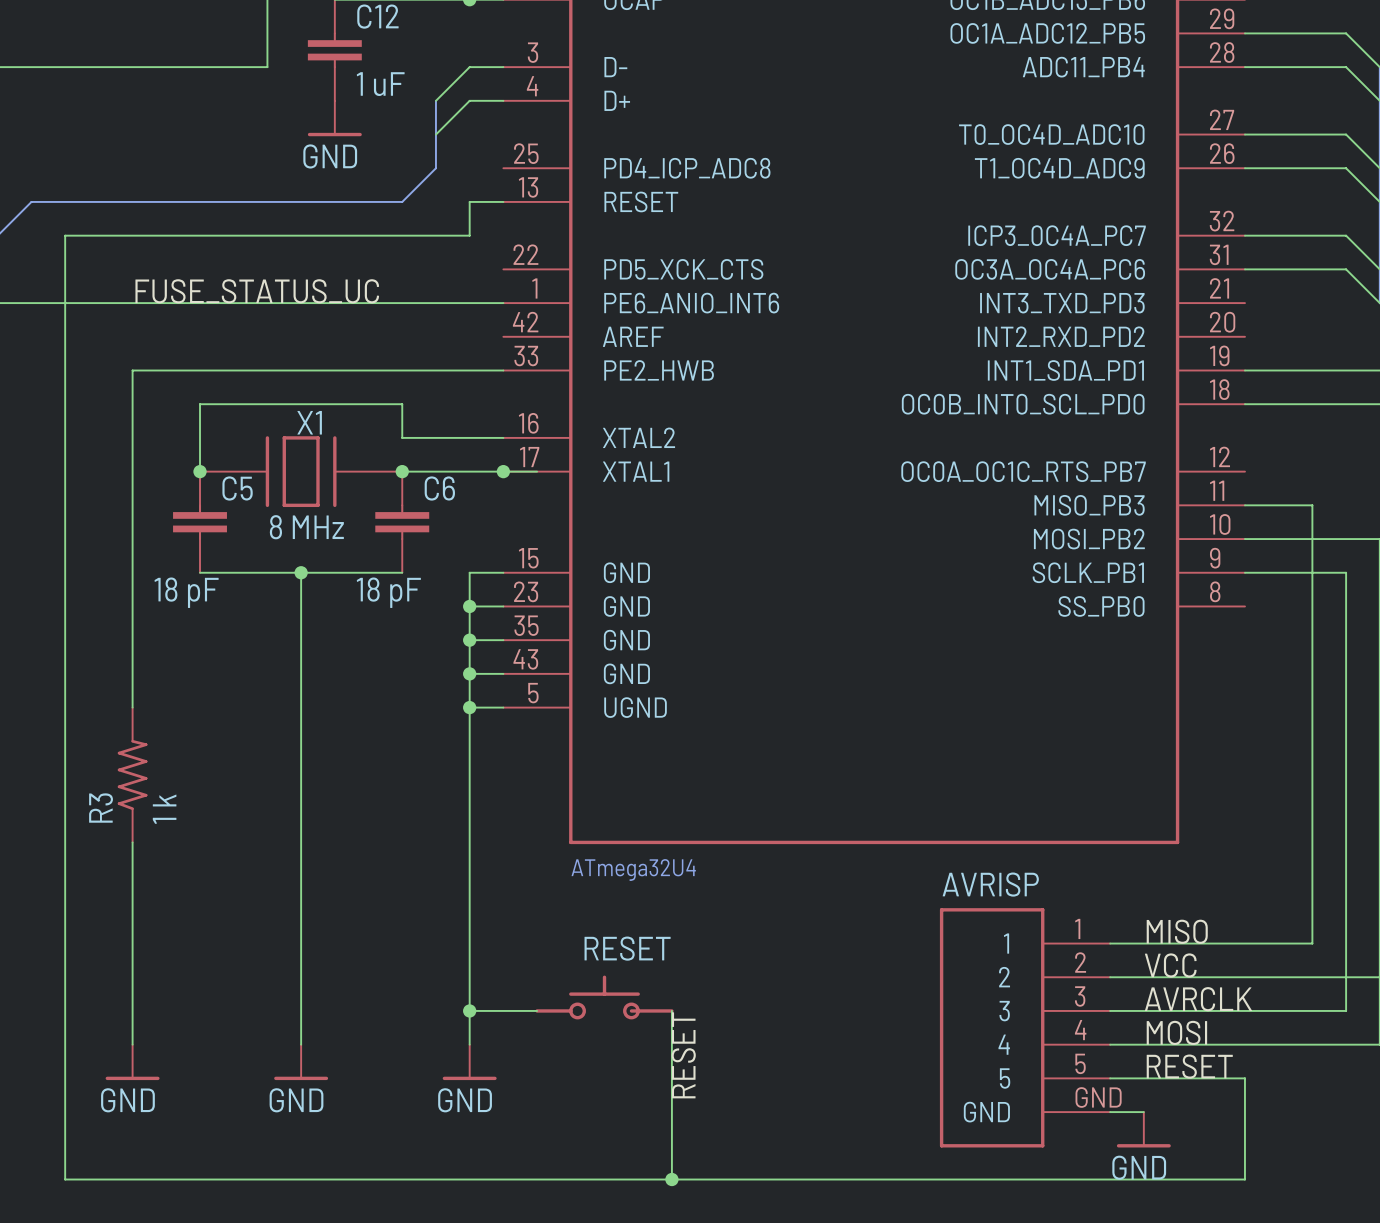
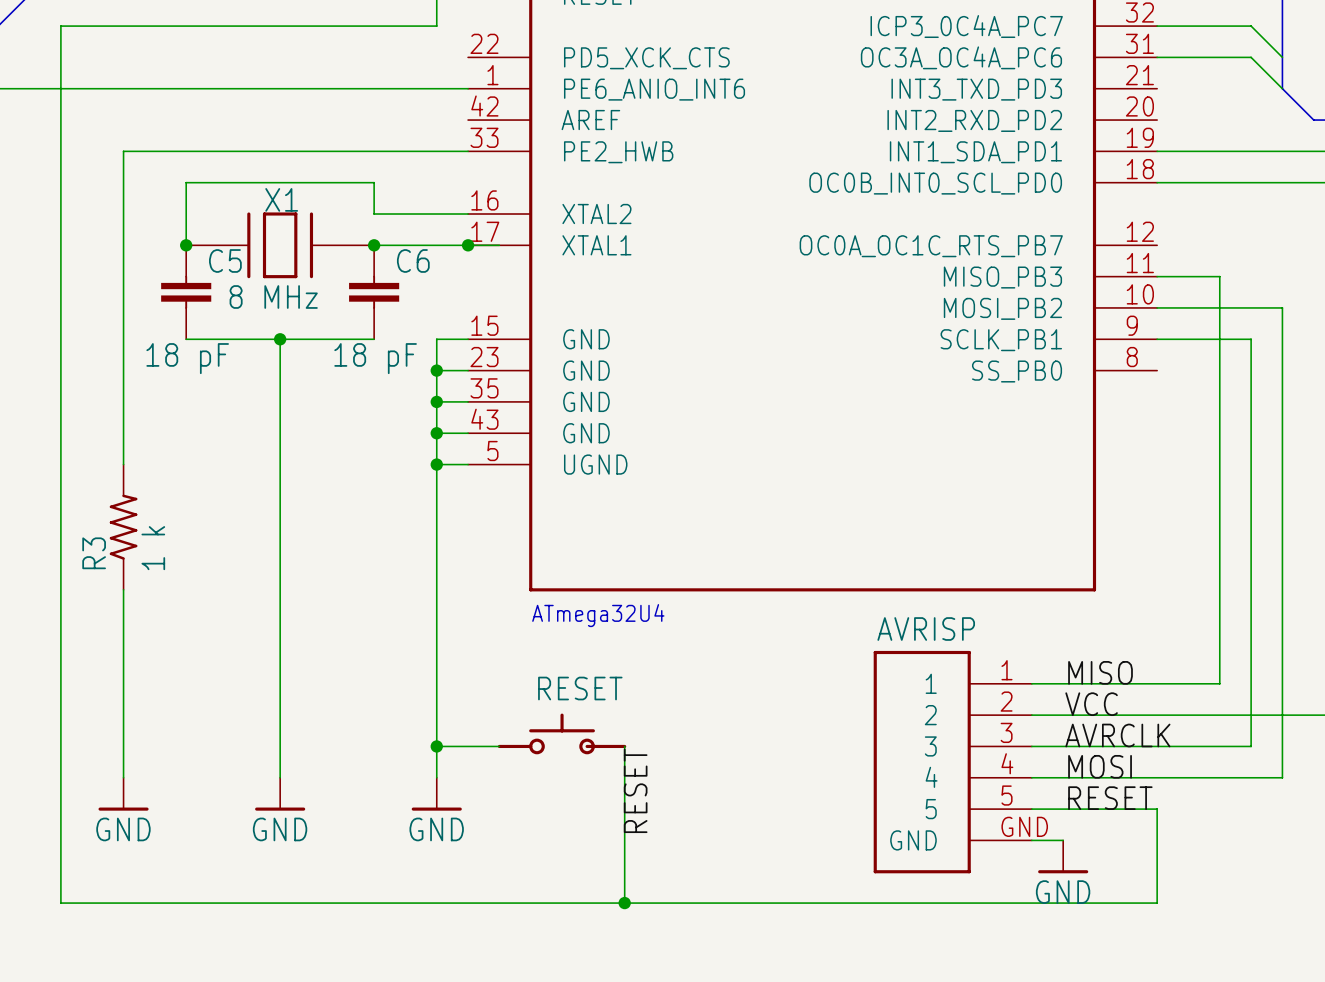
label: FUSE_STATUS_UC (257, 291) -> none

